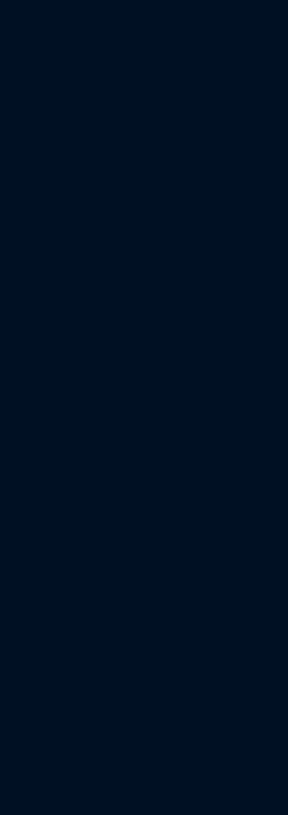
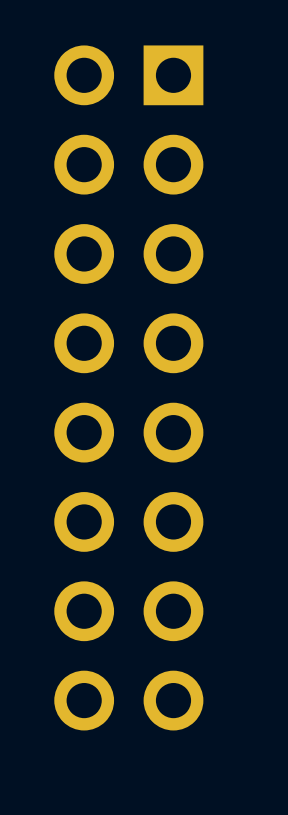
part: none -> (128, 387)

